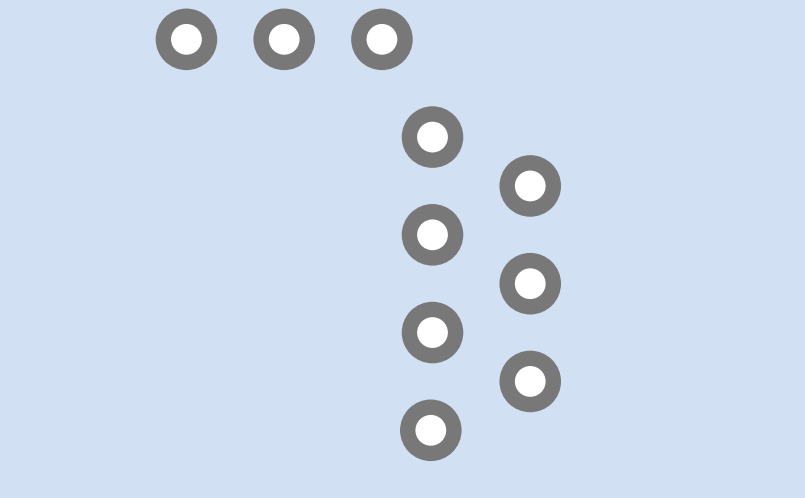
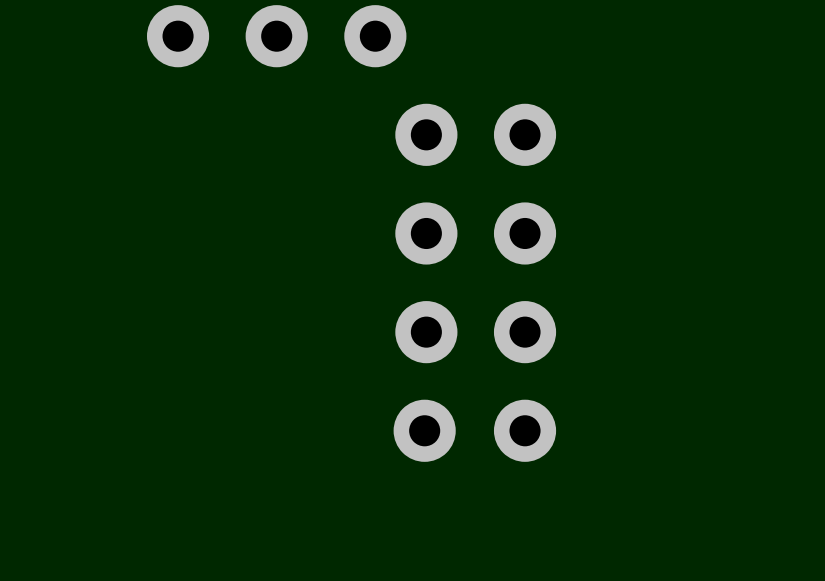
via: none -> (525, 134)
via: (530, 185) -> none
via: none -> (525, 233)
via: (530, 283) -> none
via: none -> (525, 332)
via: (530, 381) -> none
via: none -> (525, 430)

